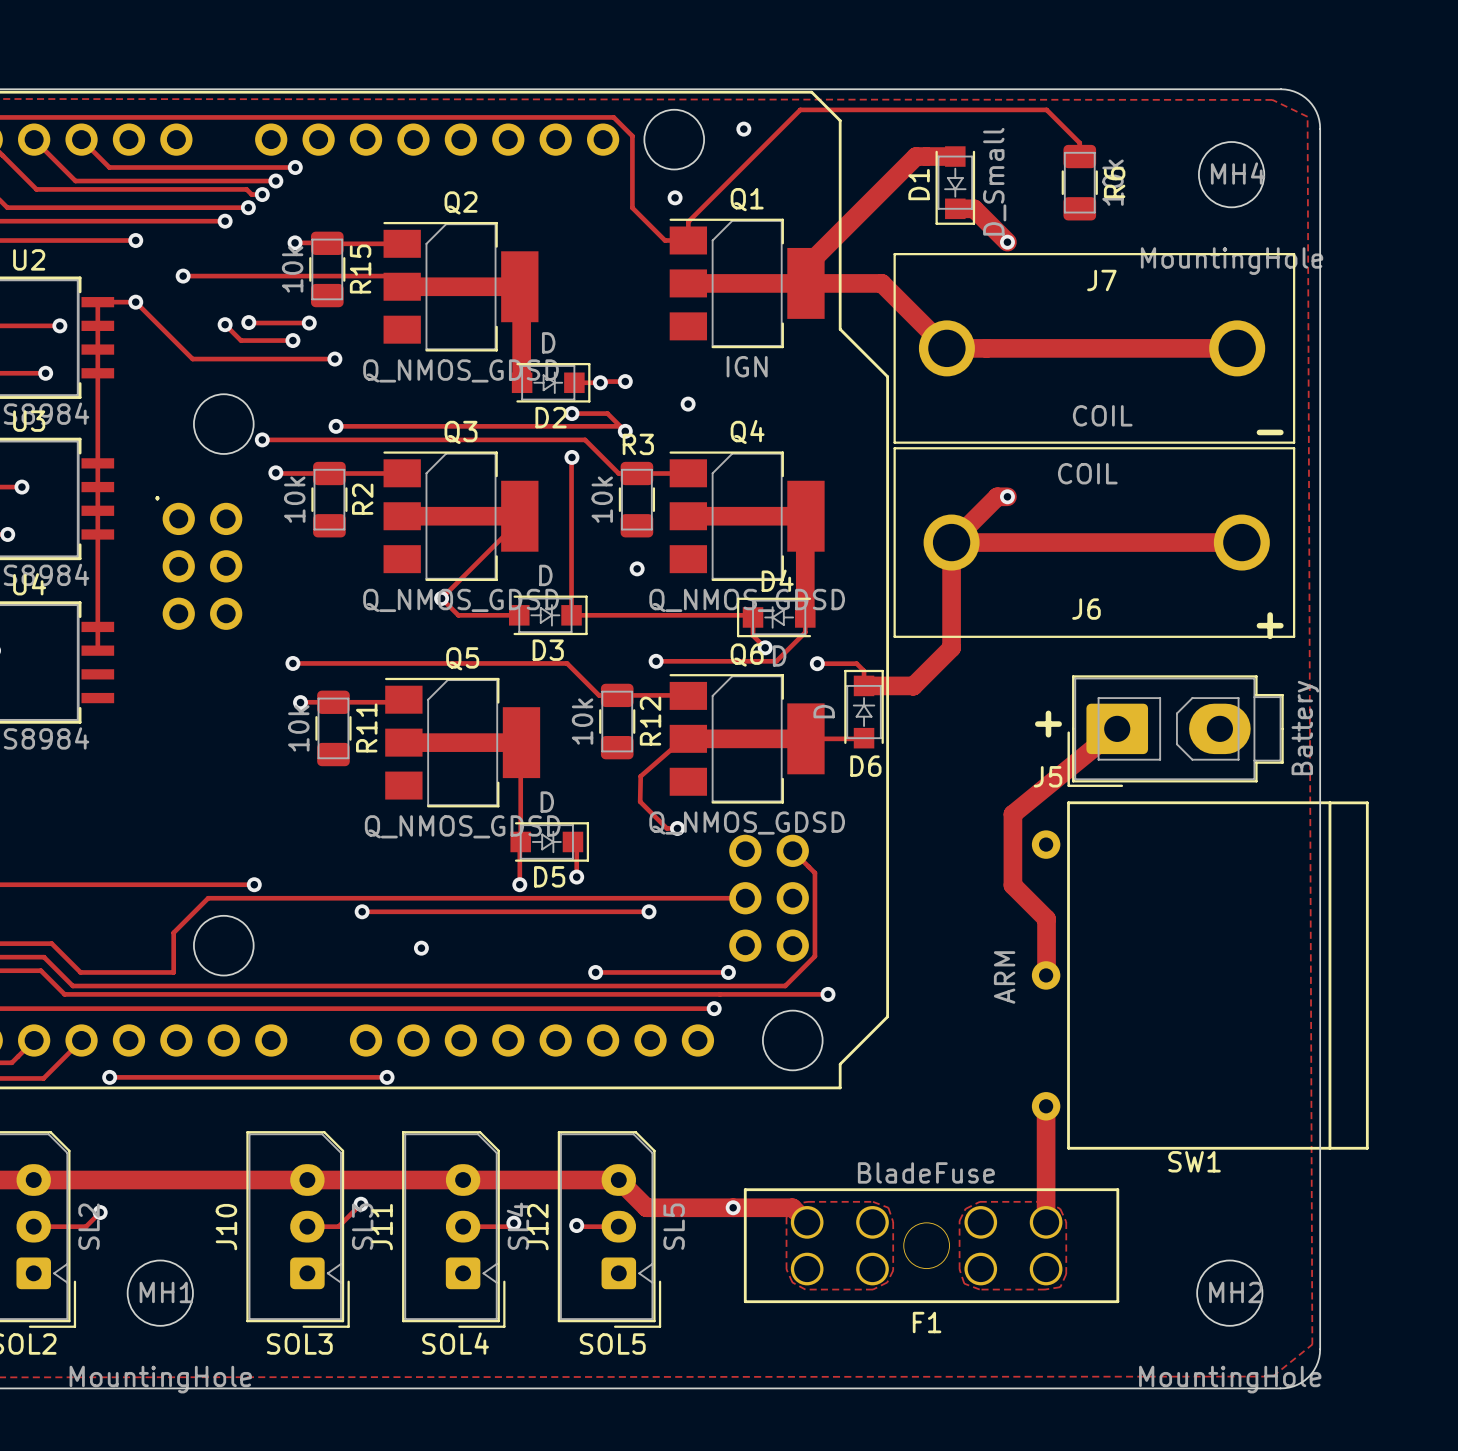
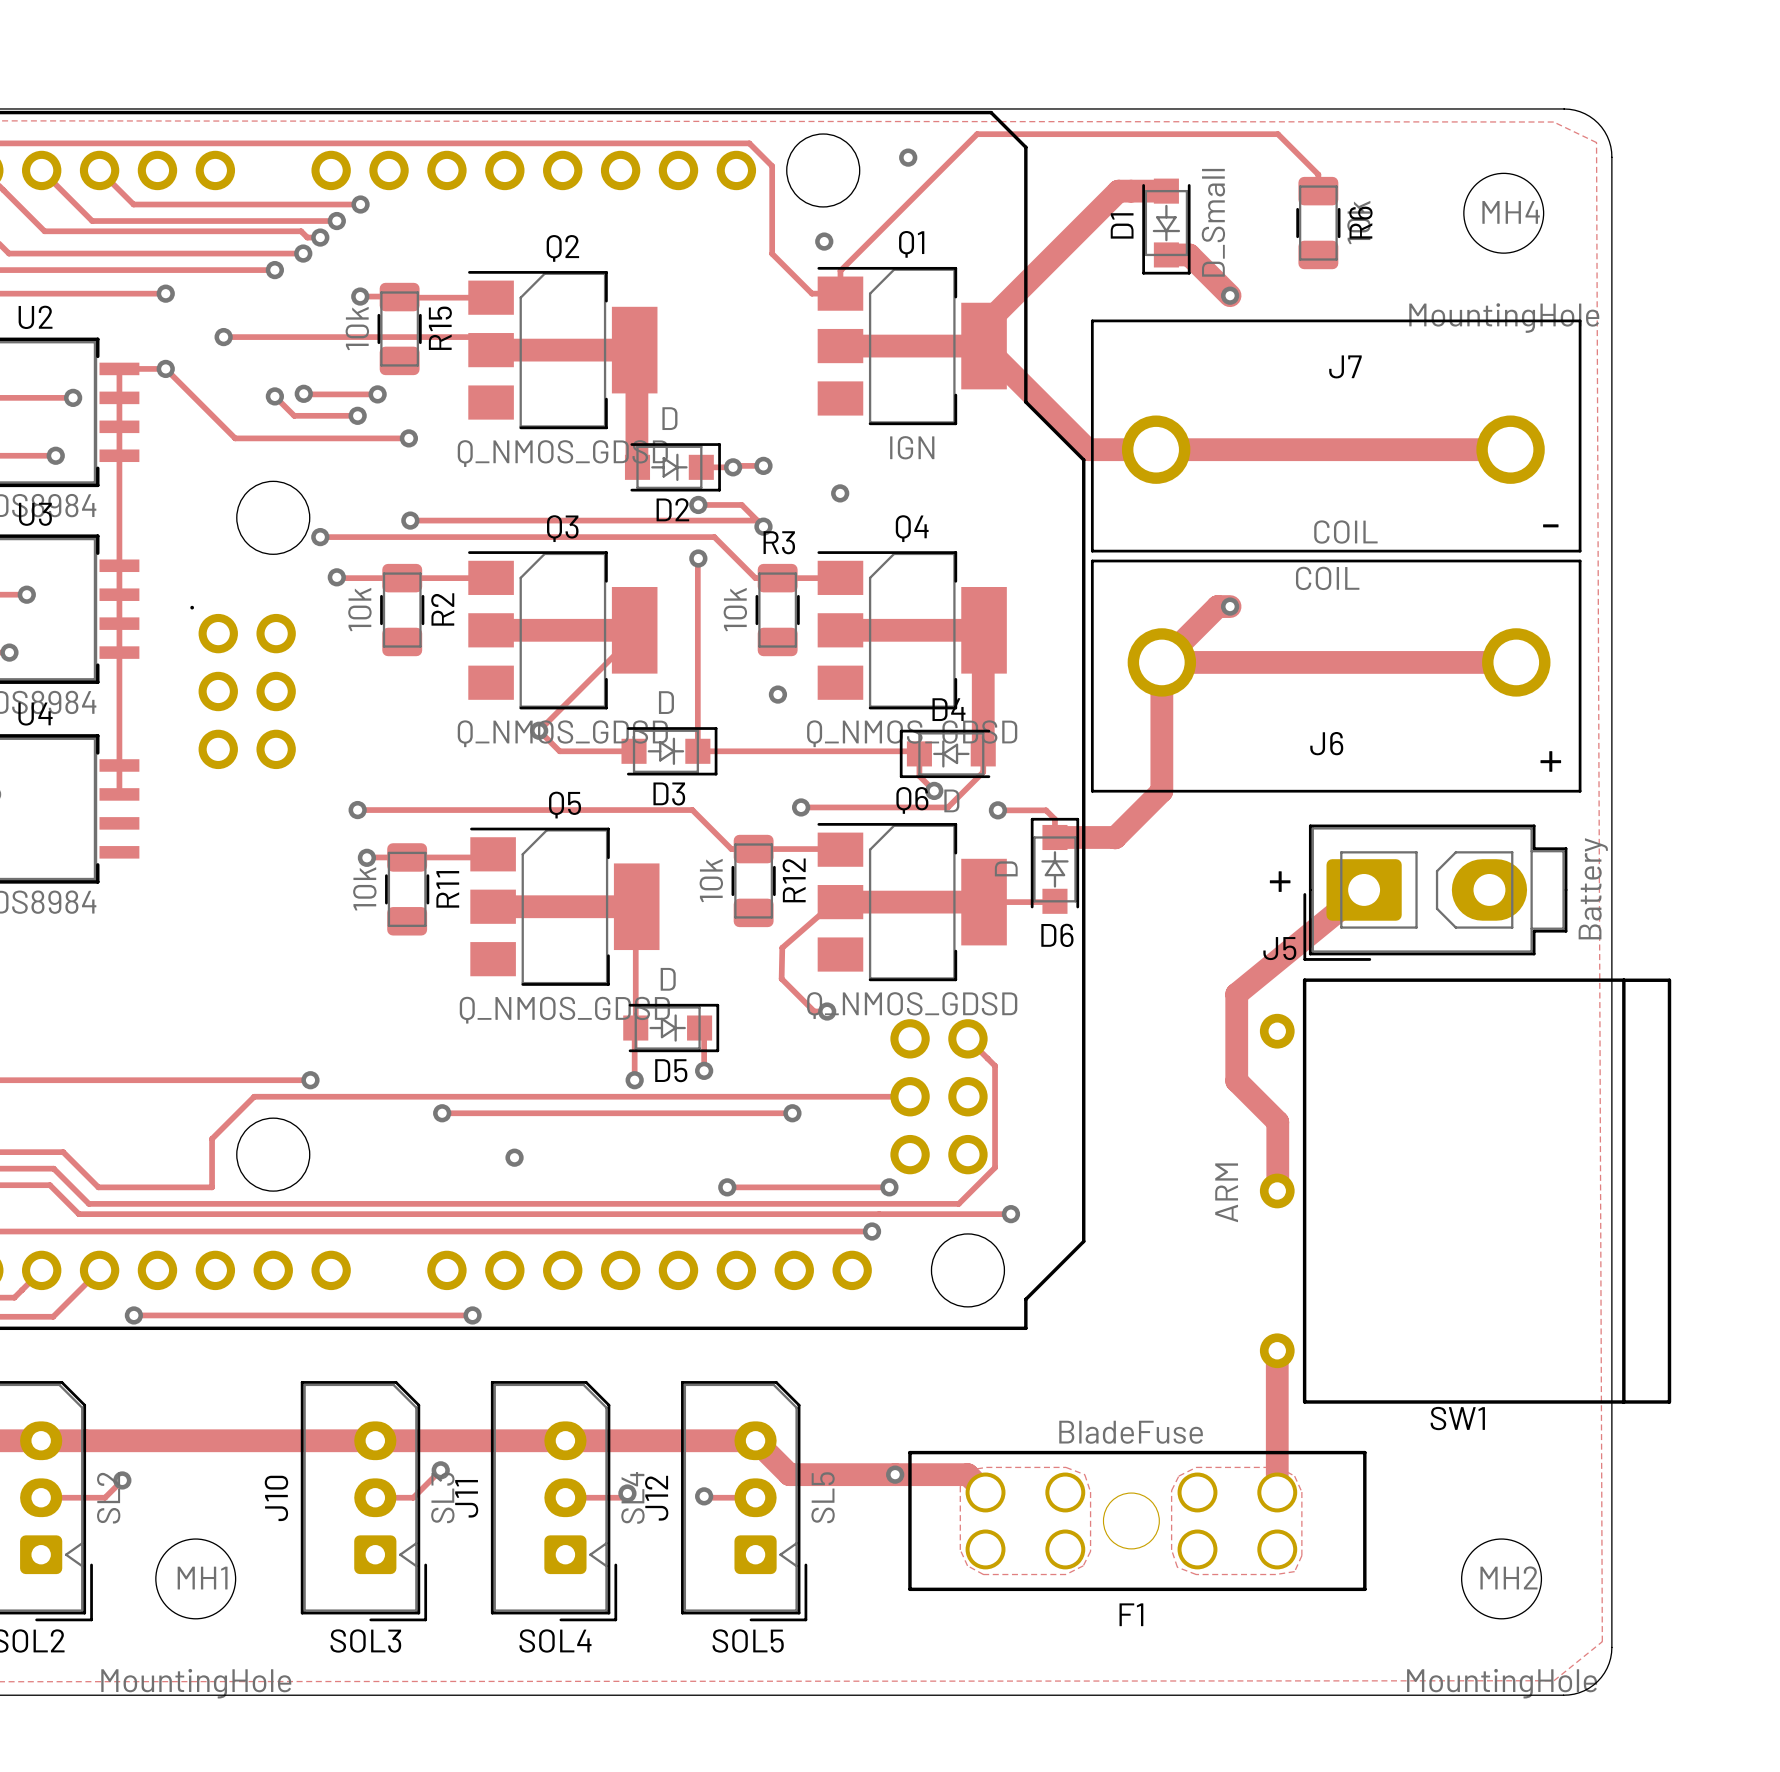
J7 footprint: [893, 252, 1296, 444] -> [1090, 319, 1582, 553]
track: (805, 283) (881, 283) (946, 348) (1237, 348) -> (984, 346) (1087, 449) (1156, 449)
track: none -> (1159, 449) (1513, 449)
J6 footprint: [893, 447, 1296, 638] -> [1090, 559, 1582, 793]

